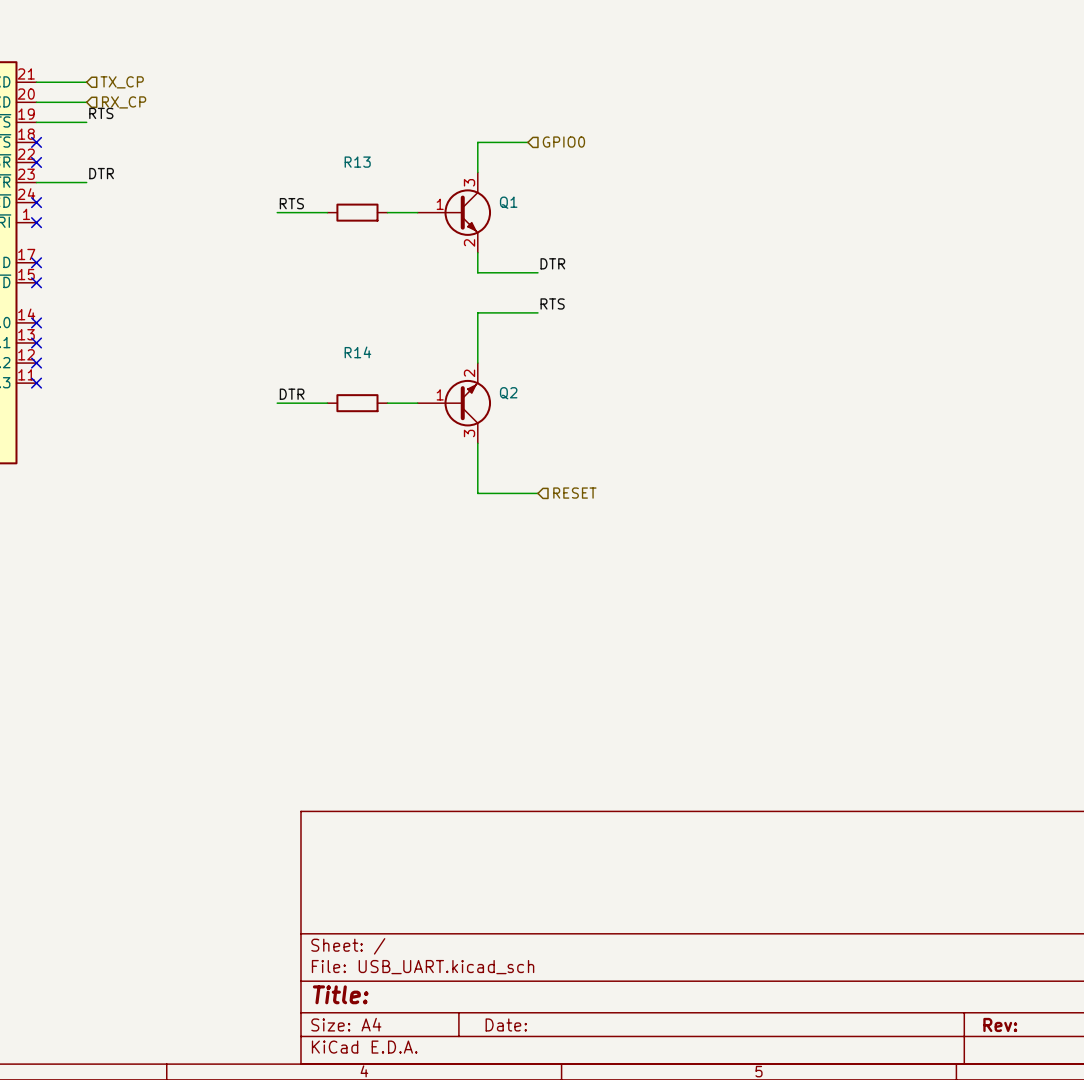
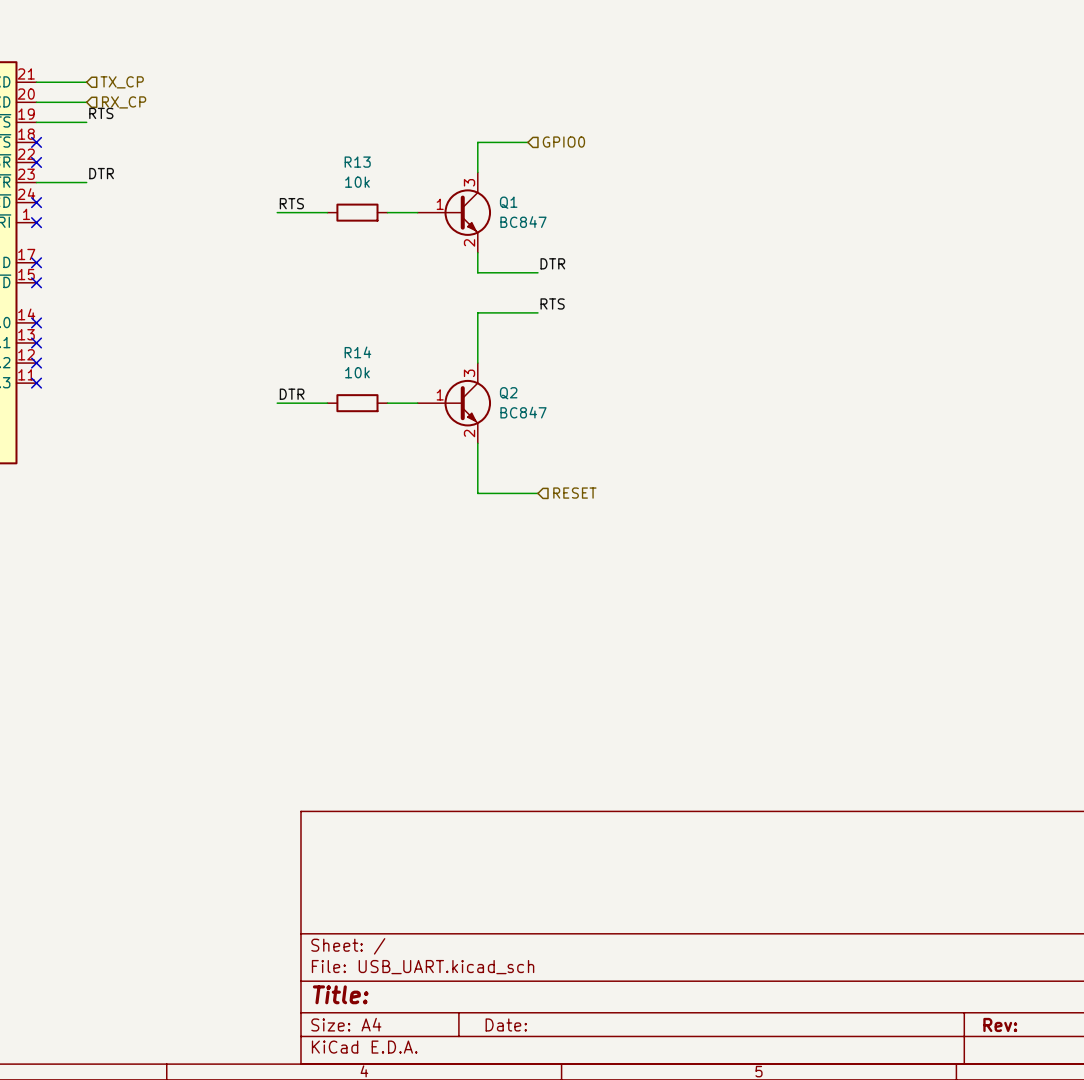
R13 value: none -> 10k (357, 182)
Q1 value: none -> BC847 (523, 222)
R14 value: none -> 10k (357, 372)
Q2 flip: as is (467, 403) -> up-down (467, 403)
Q2 value: none -> BC847 (523, 412)

